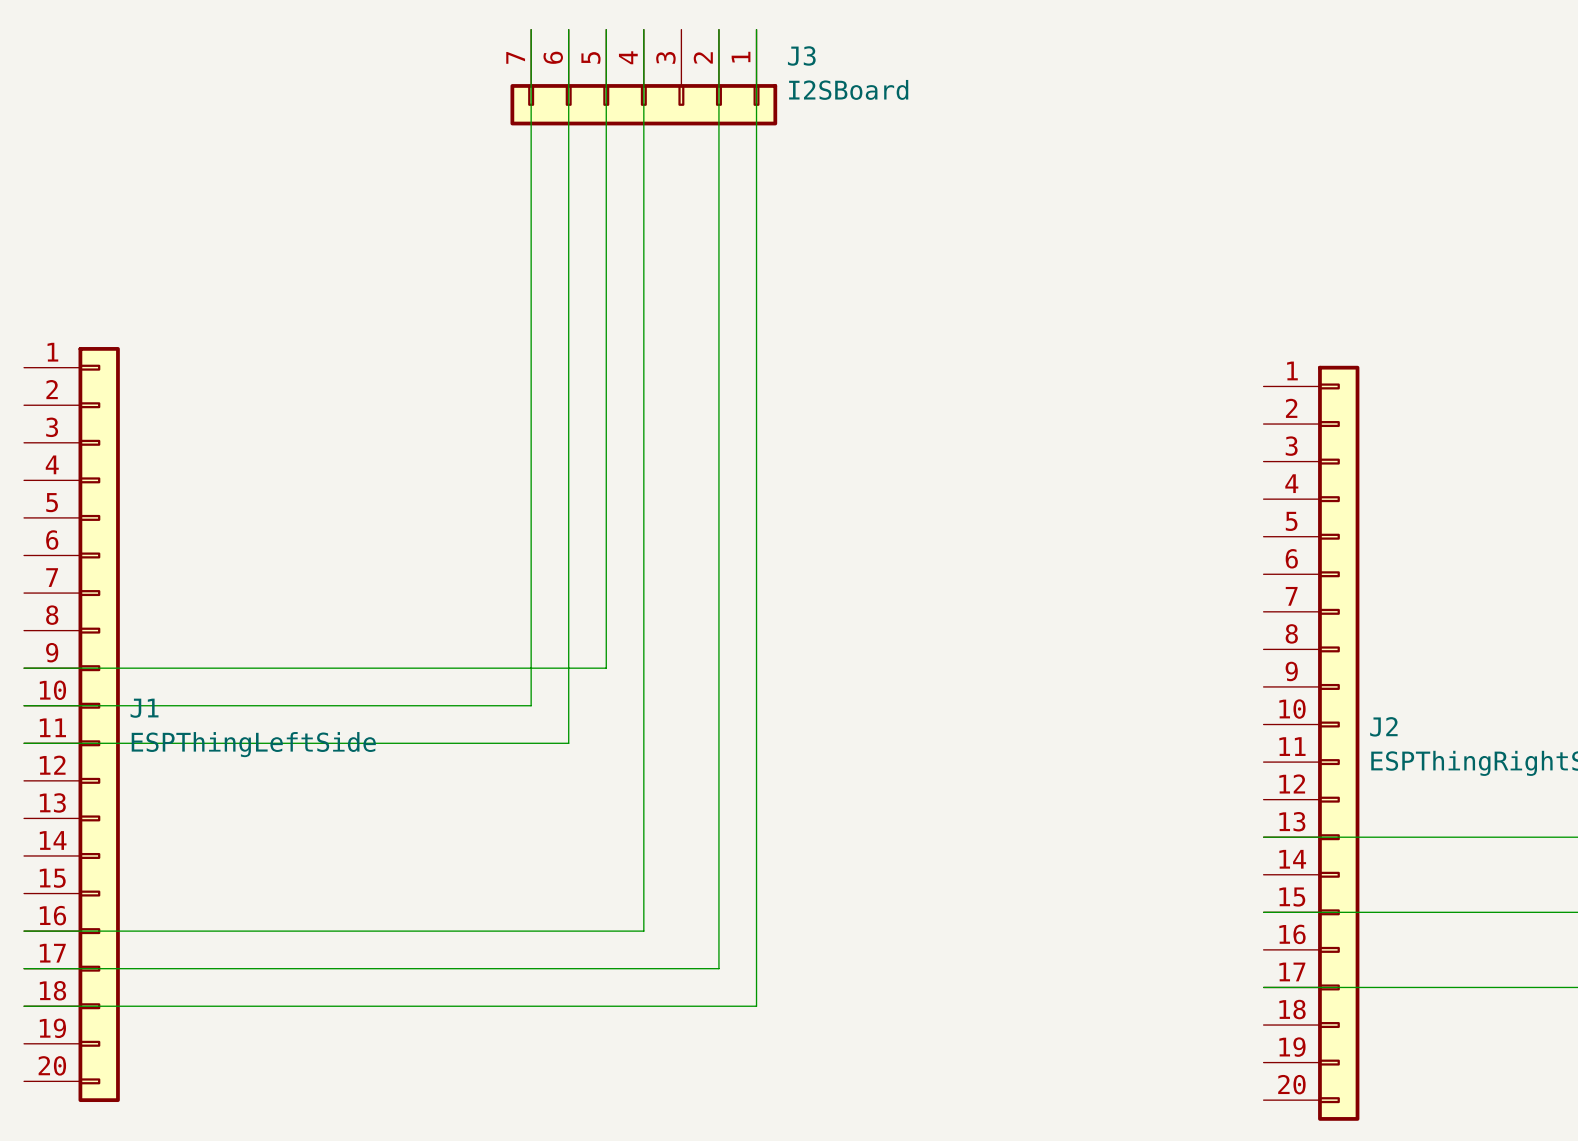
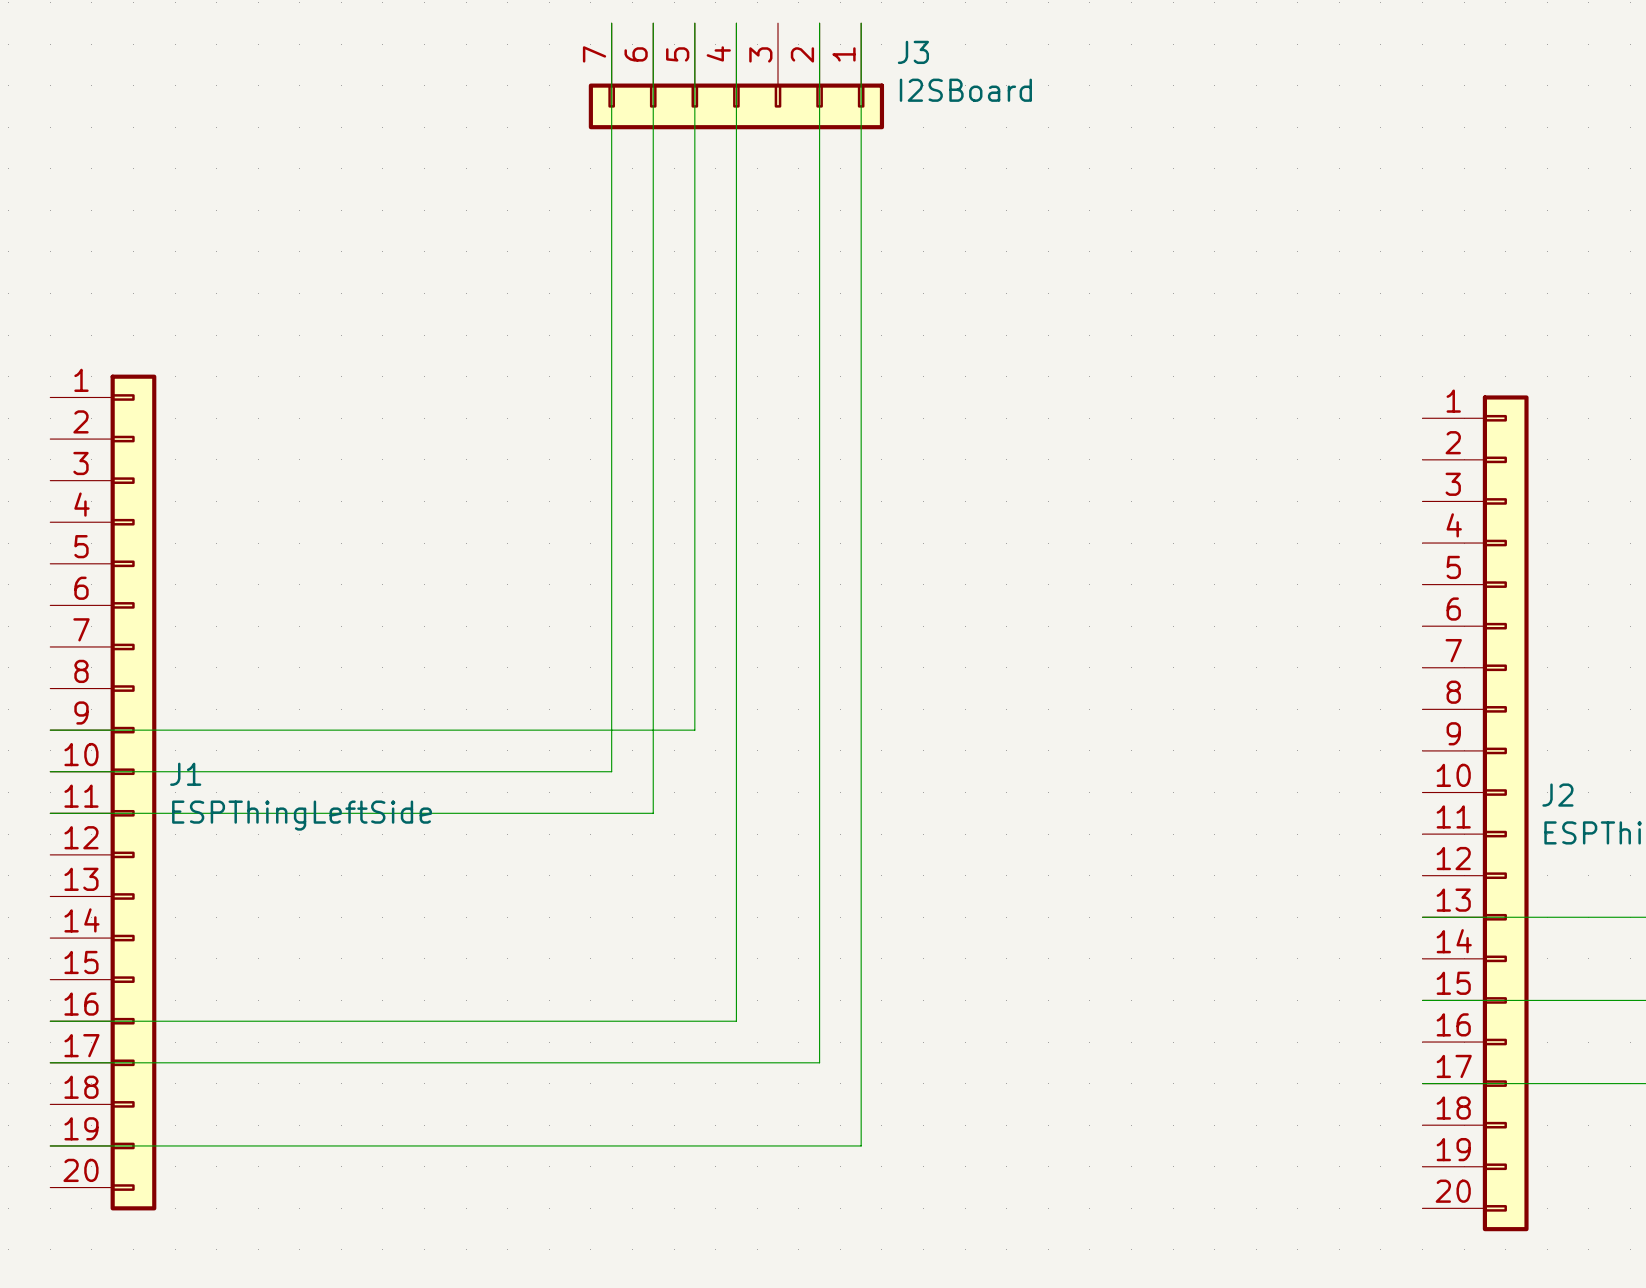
wire: (24, 1006) (756, 1006) -> (50, 1145) (861, 1145) (861, 1104)

